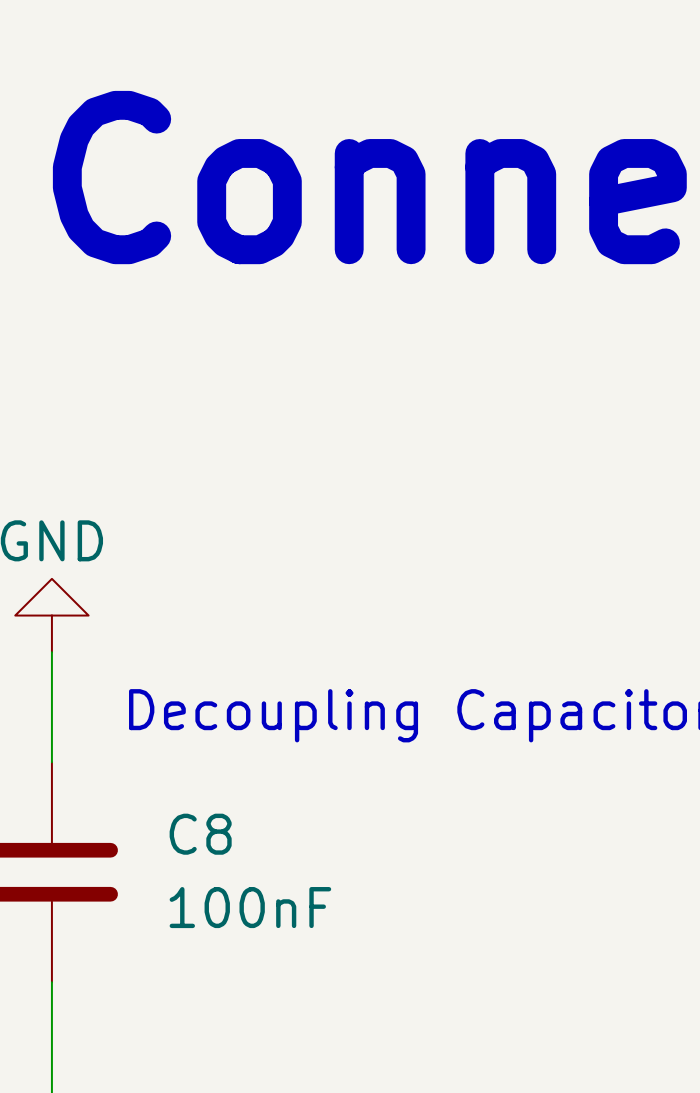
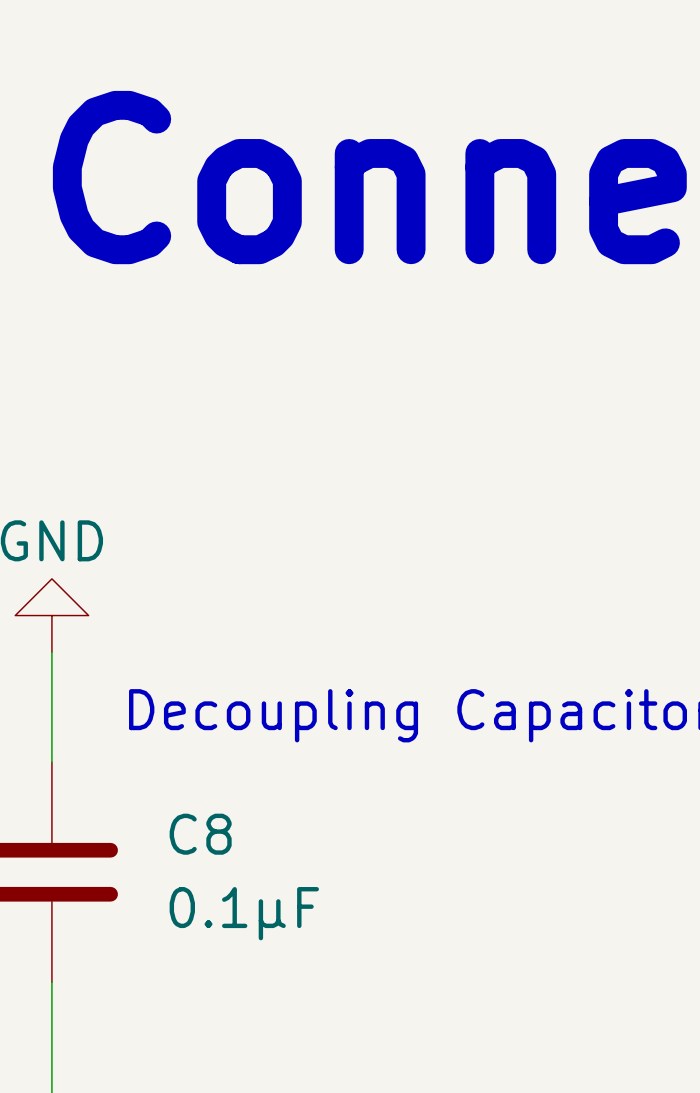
C8 value: 100nF (250, 907) -> 0.1μF (244, 913)

